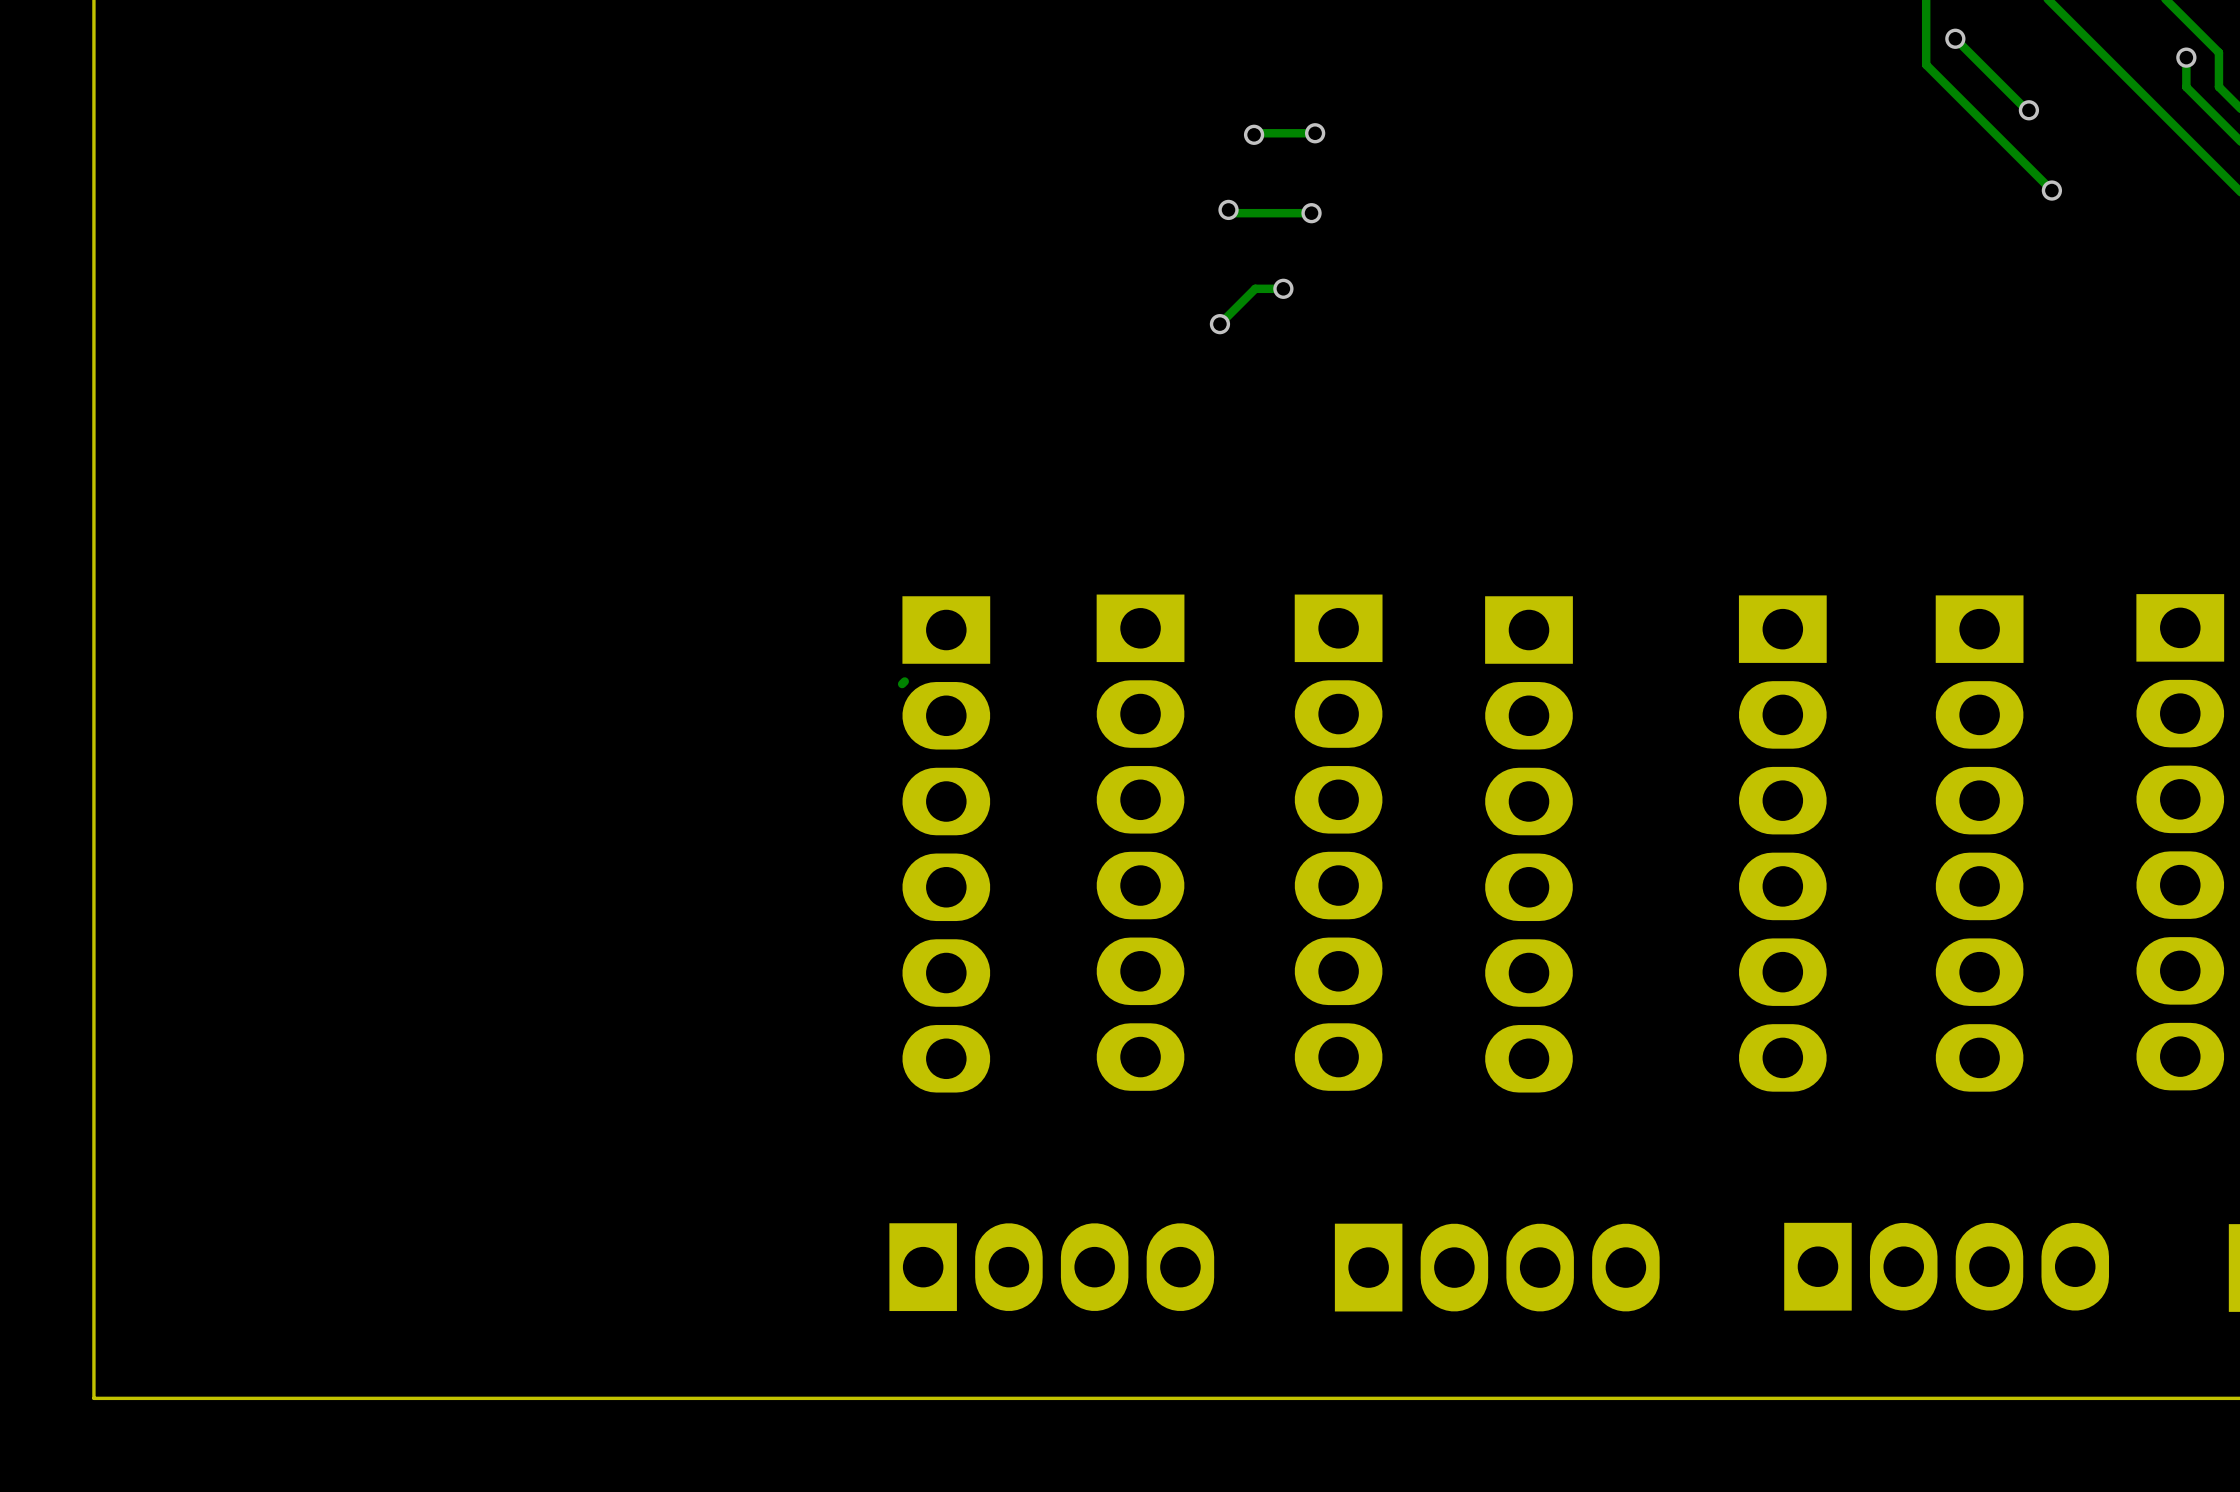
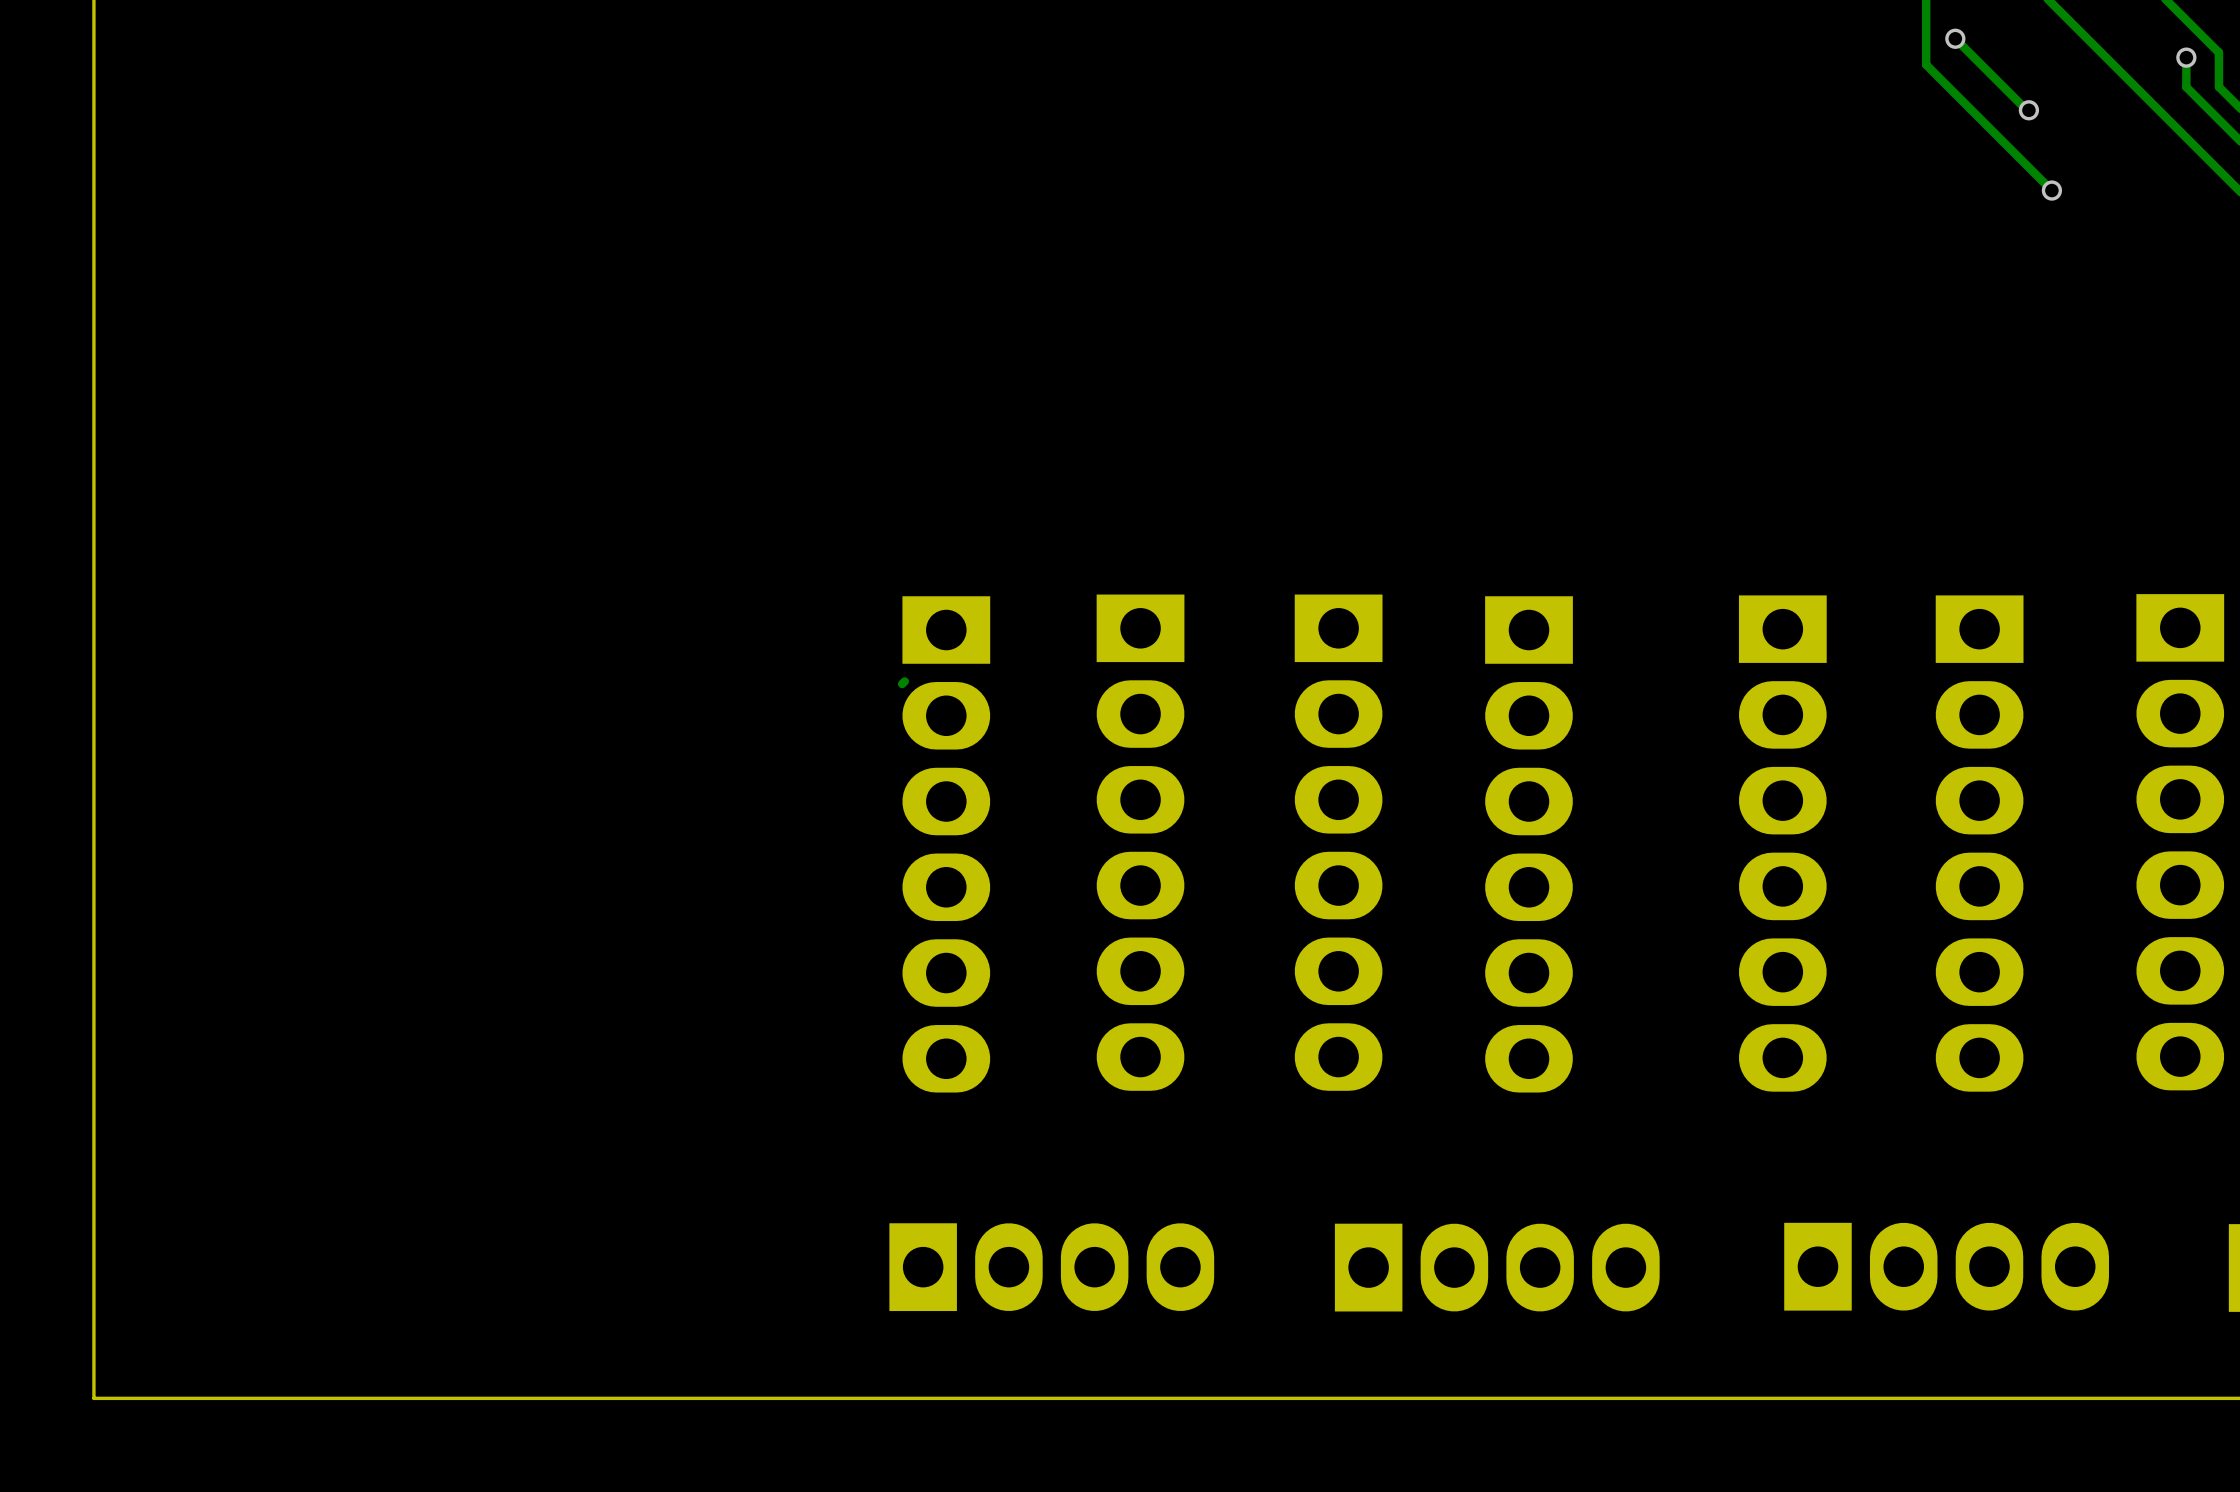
track: (1315, 133) (1255, 133) (1254, 134) -> none
via: (1315, 133) -> none
via: (1254, 134) -> none
track: (1228, 209) (1231, 213) (1311, 213) -> none
via: (1228, 209) -> none
via: (1311, 213) -> none
track: (1283, 288) (1255, 288) (1219, 324) -> none
via: (1283, 288) -> none
via: (1219, 324) -> none

